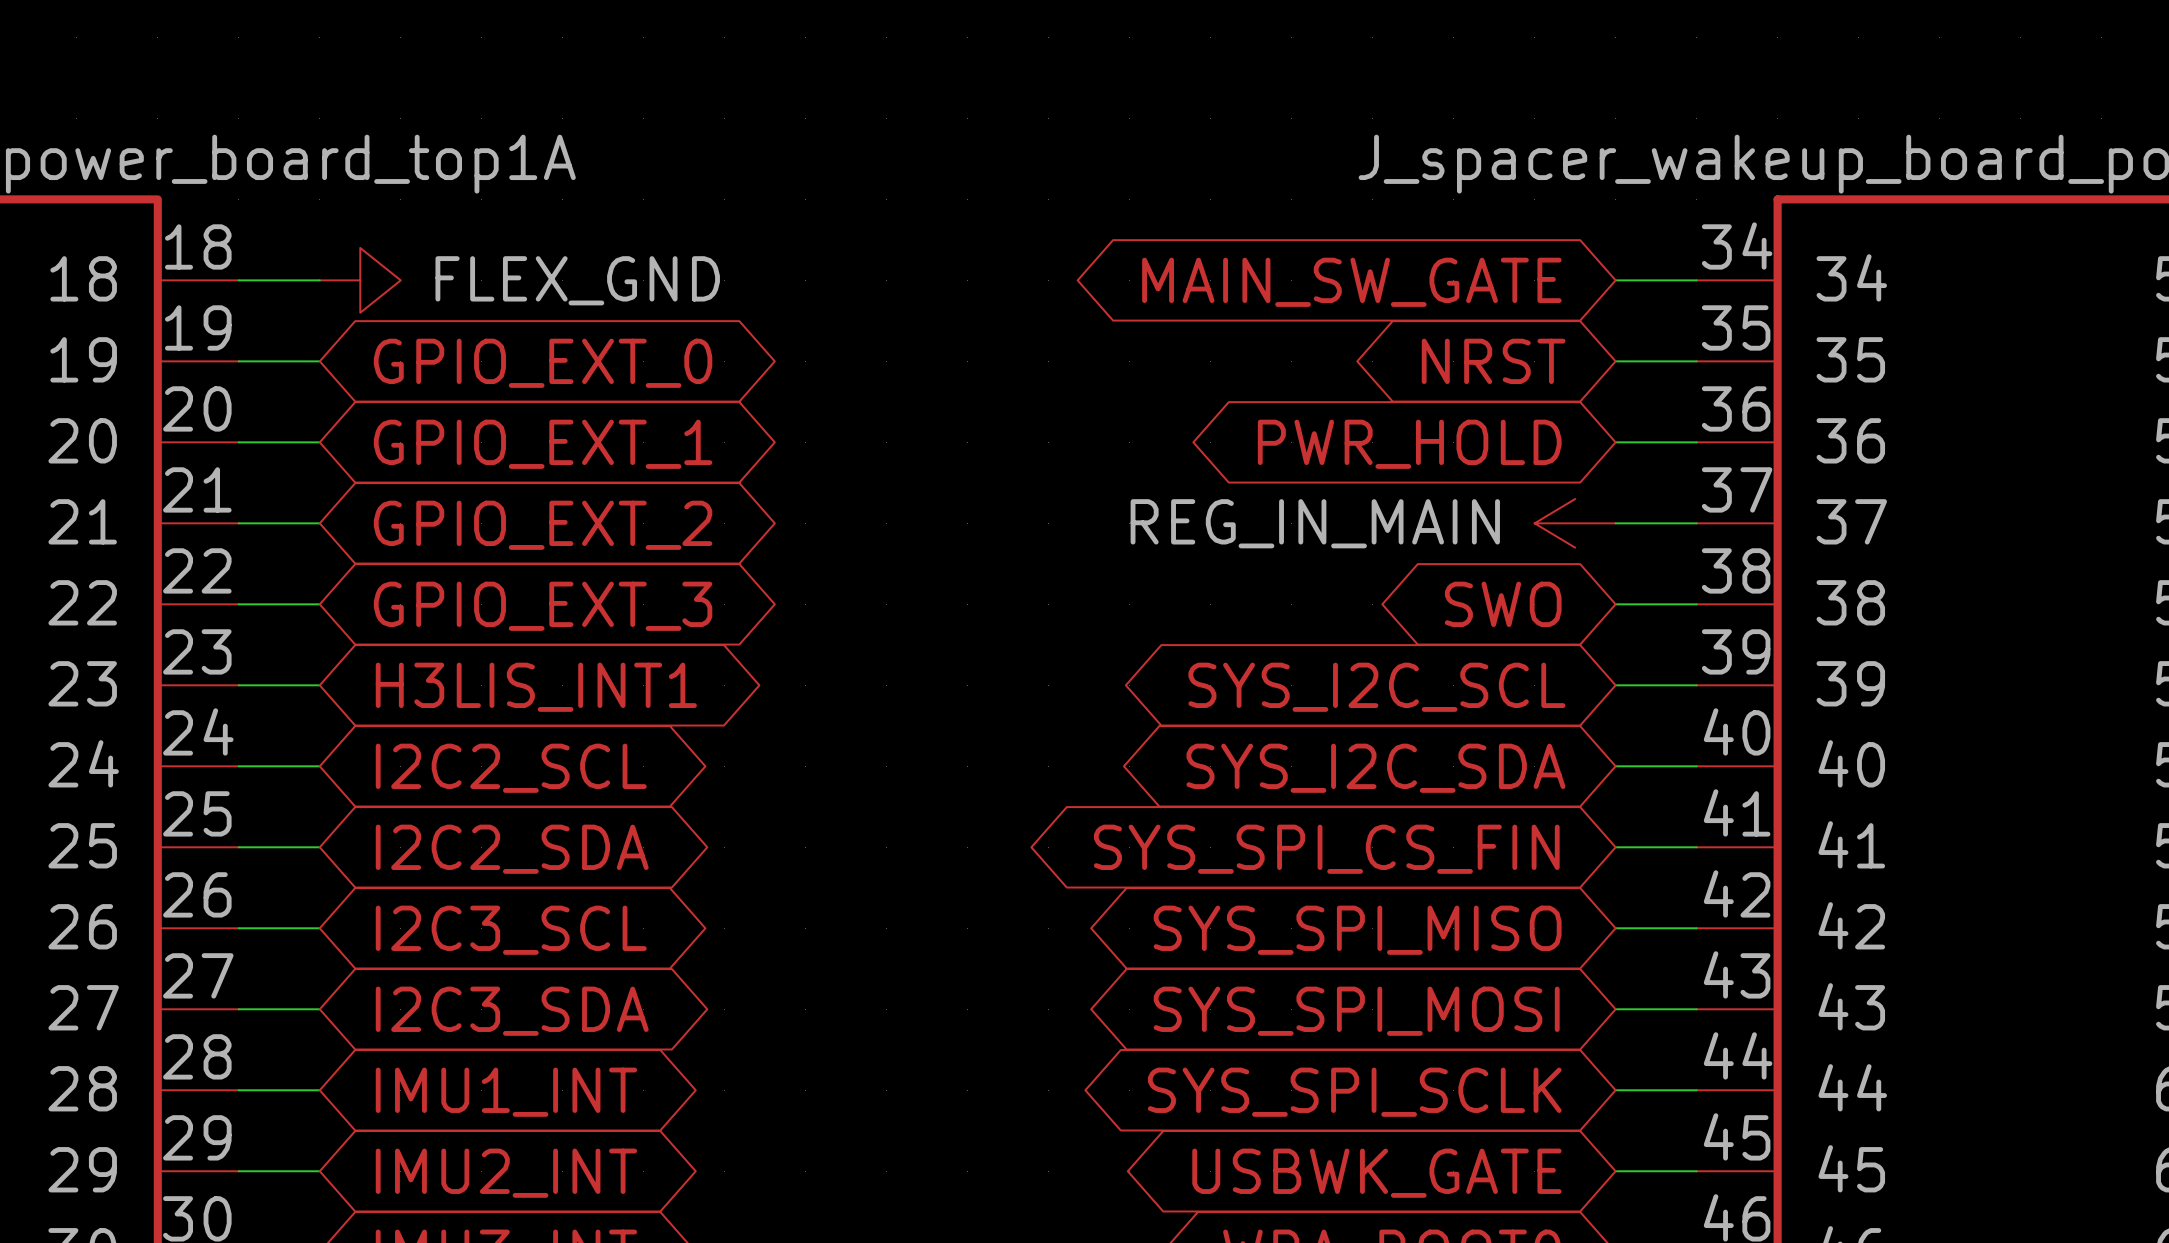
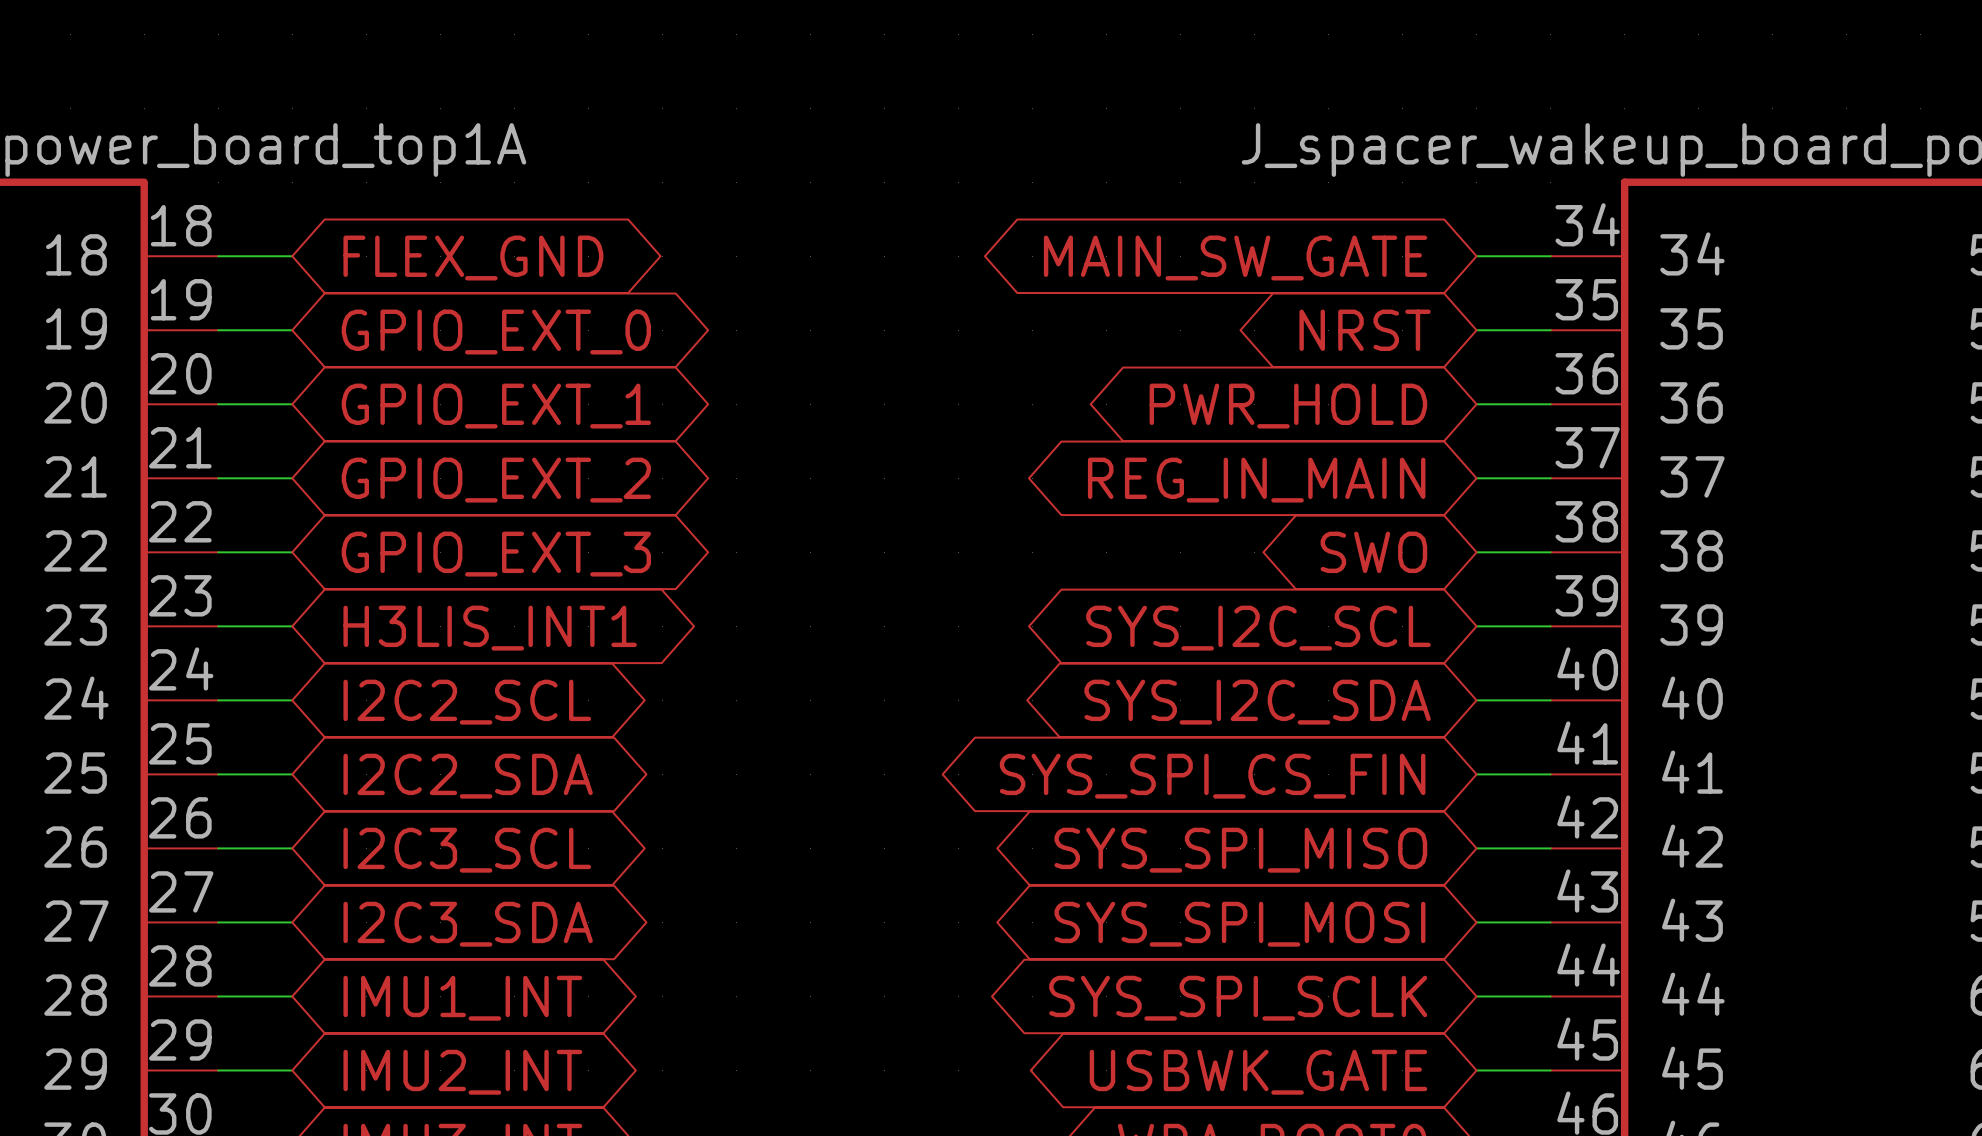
power symbol: FLEX_GND (360, 280) -> none
global label: none -> FLEX_GND (473, 258)
power symbol: REG_IN_MAIN (1575, 523) -> none
global label: none -> REG_IN_MAIN (1256, 480)

